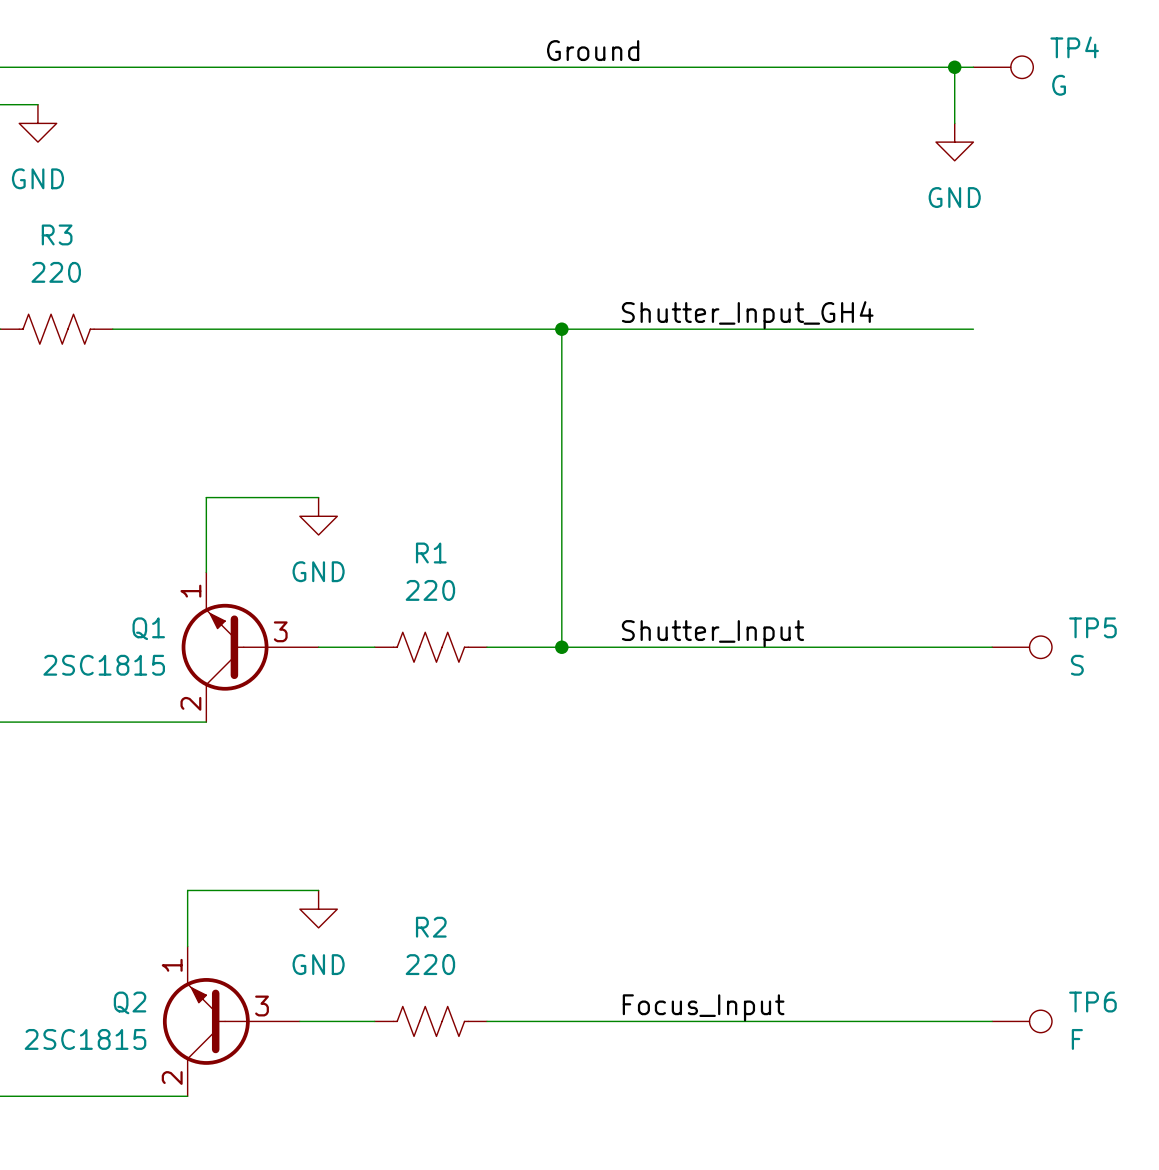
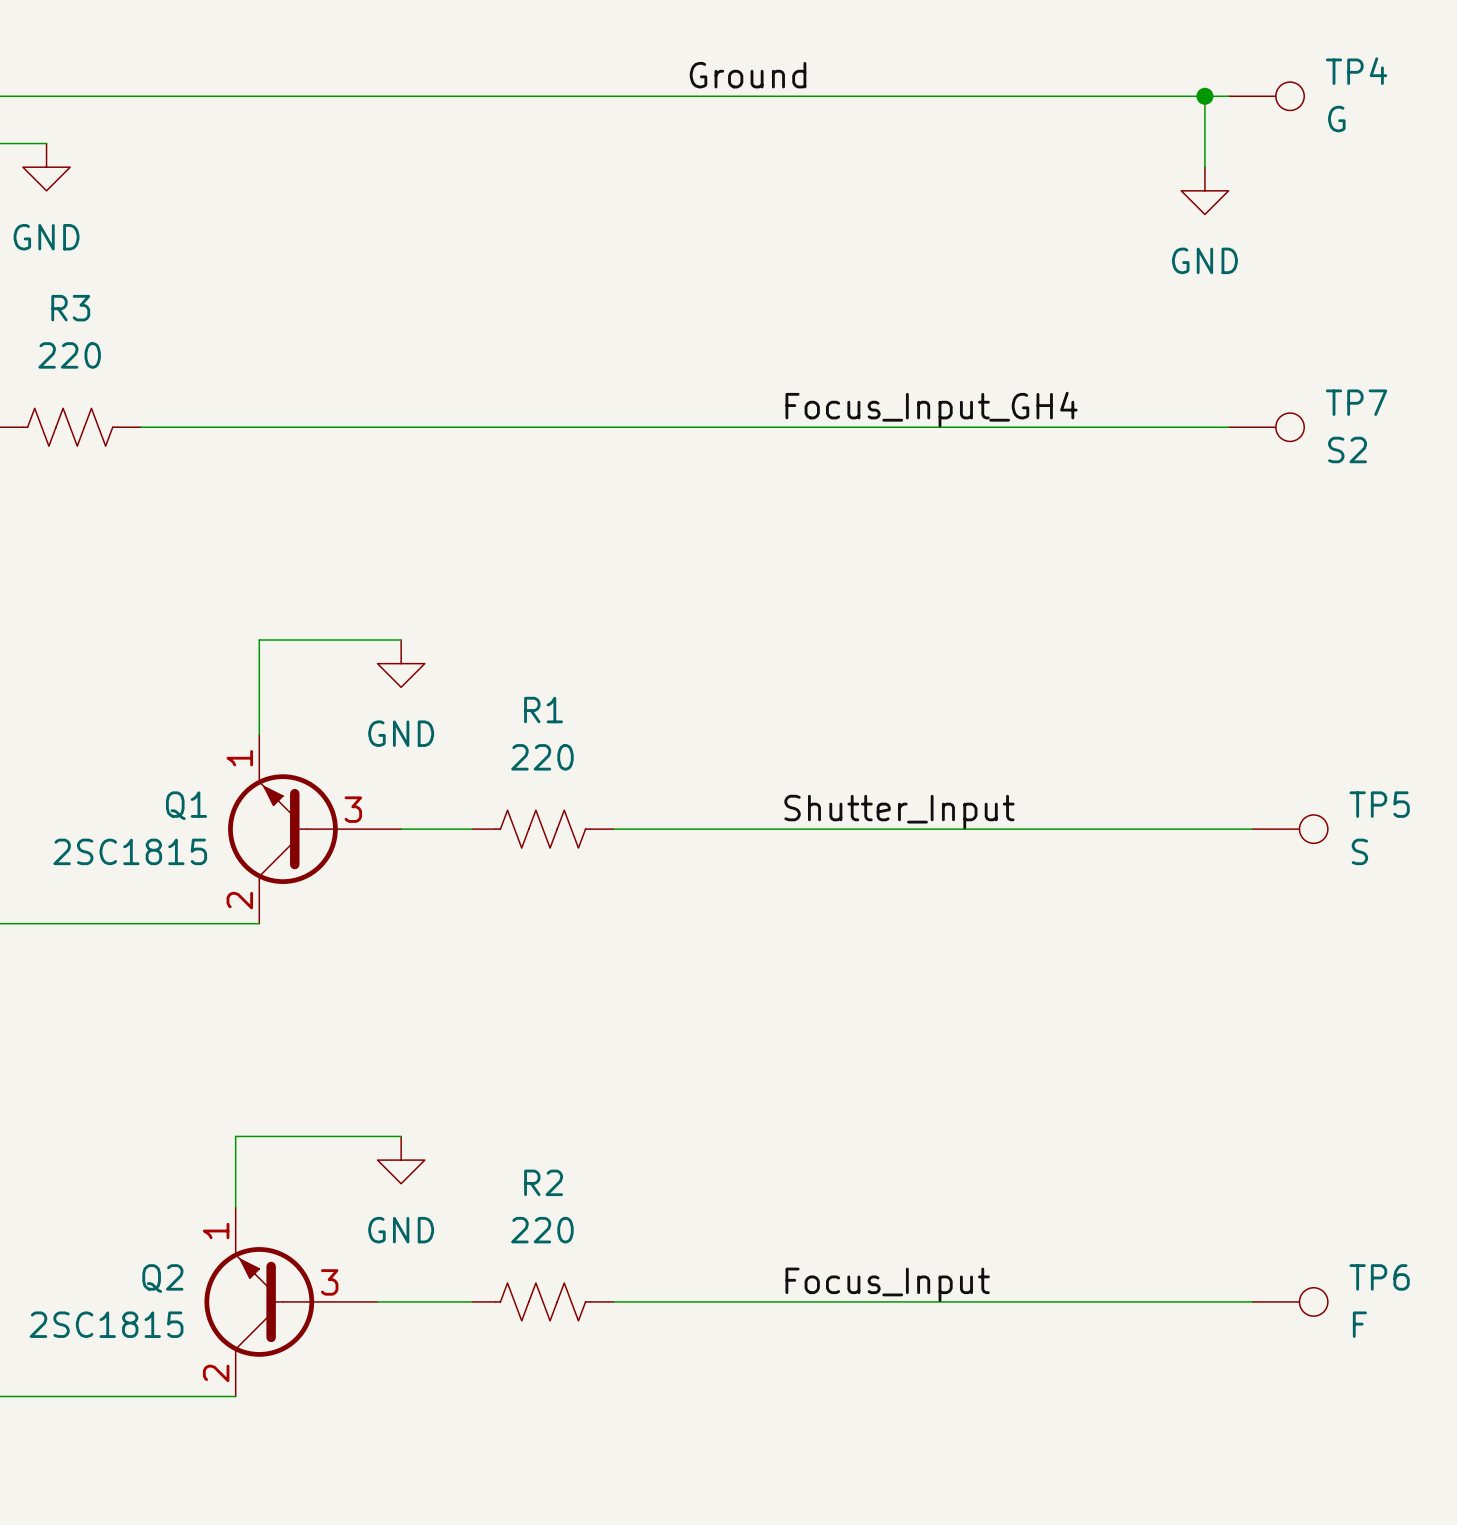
label: Shutter_Input_GH4 (747, 315) -> Focus_Input_GH4 (931, 409)
wire: (561, 329) (561, 647) -> none
junction: (561, 329) -> none
TP7: none -> S2 (1266, 427)
junction: (561, 647) -> none

